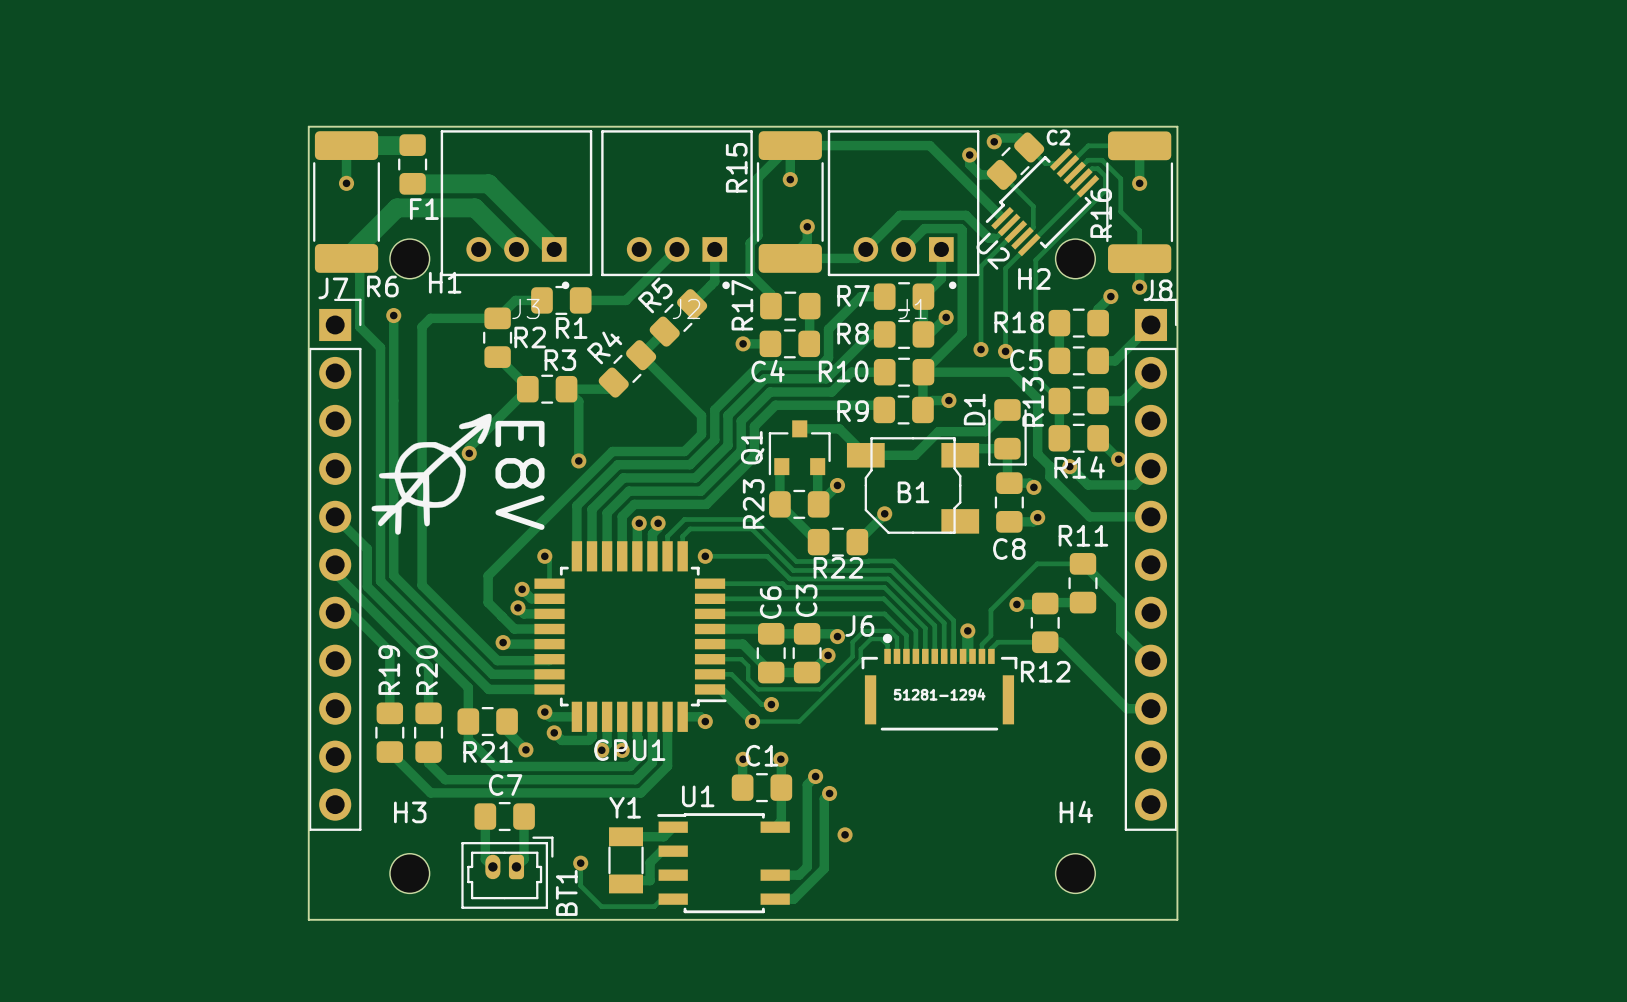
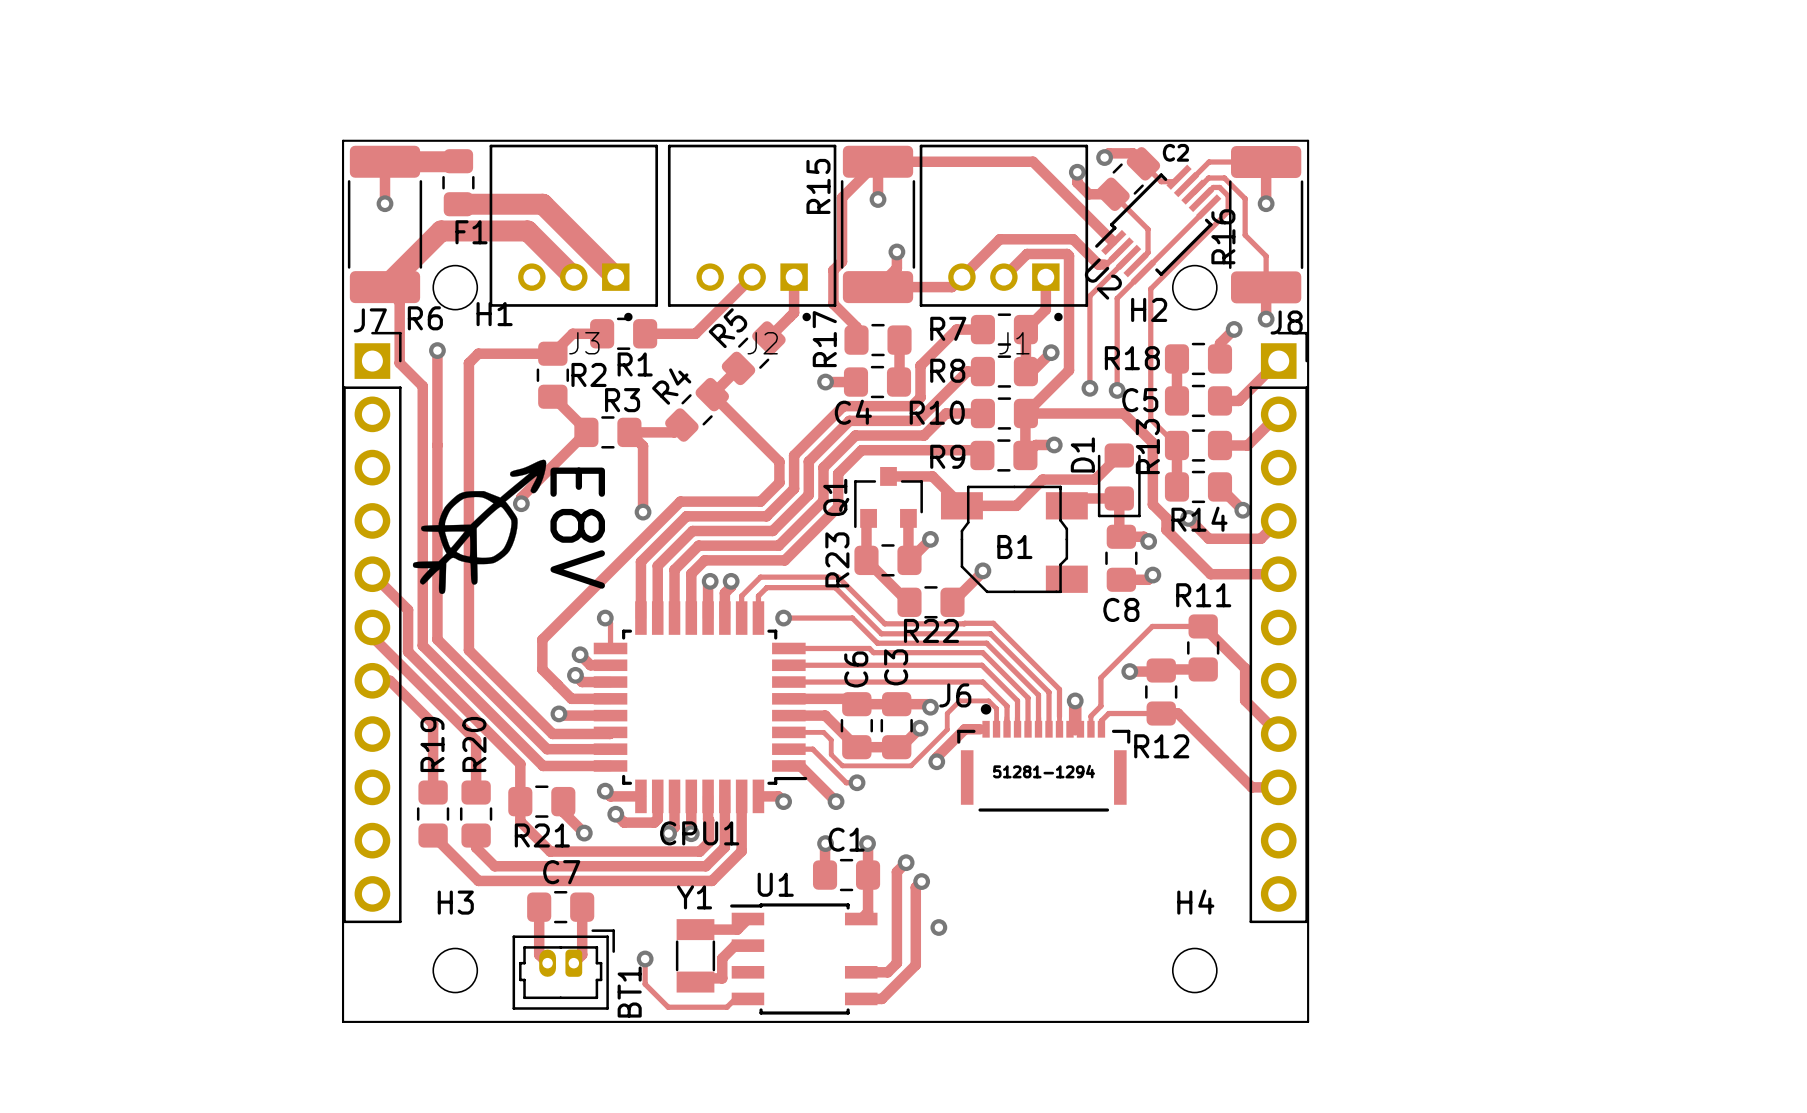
track: (887, 656) (887, 645) (881, 639) (870, 639) (860, 649) (860, 660) (799, 721) (752, 721) -> (986, 729) (964, 729) (936, 757) (936, 761)
via: none -> (936, 761)

